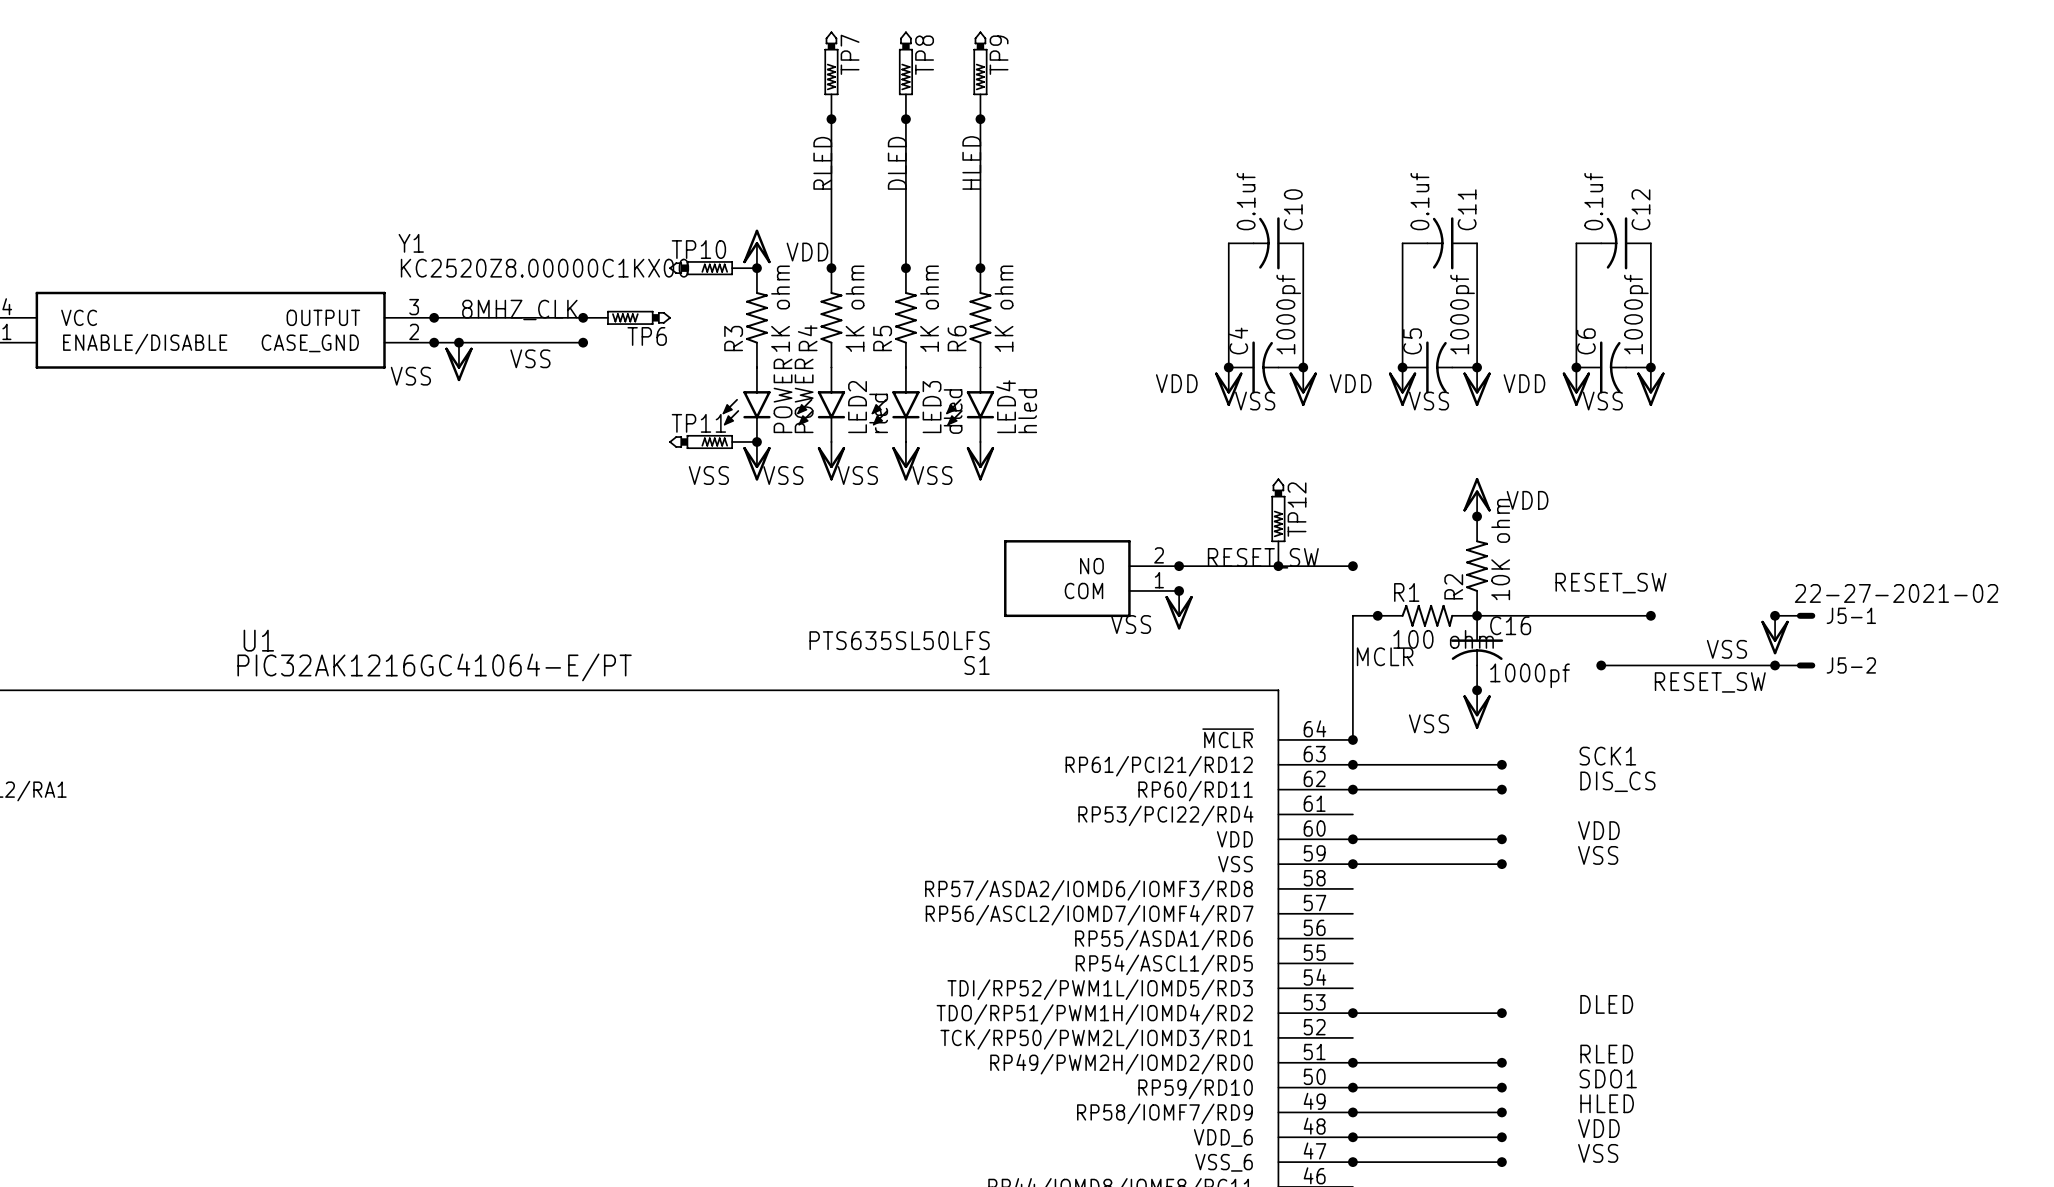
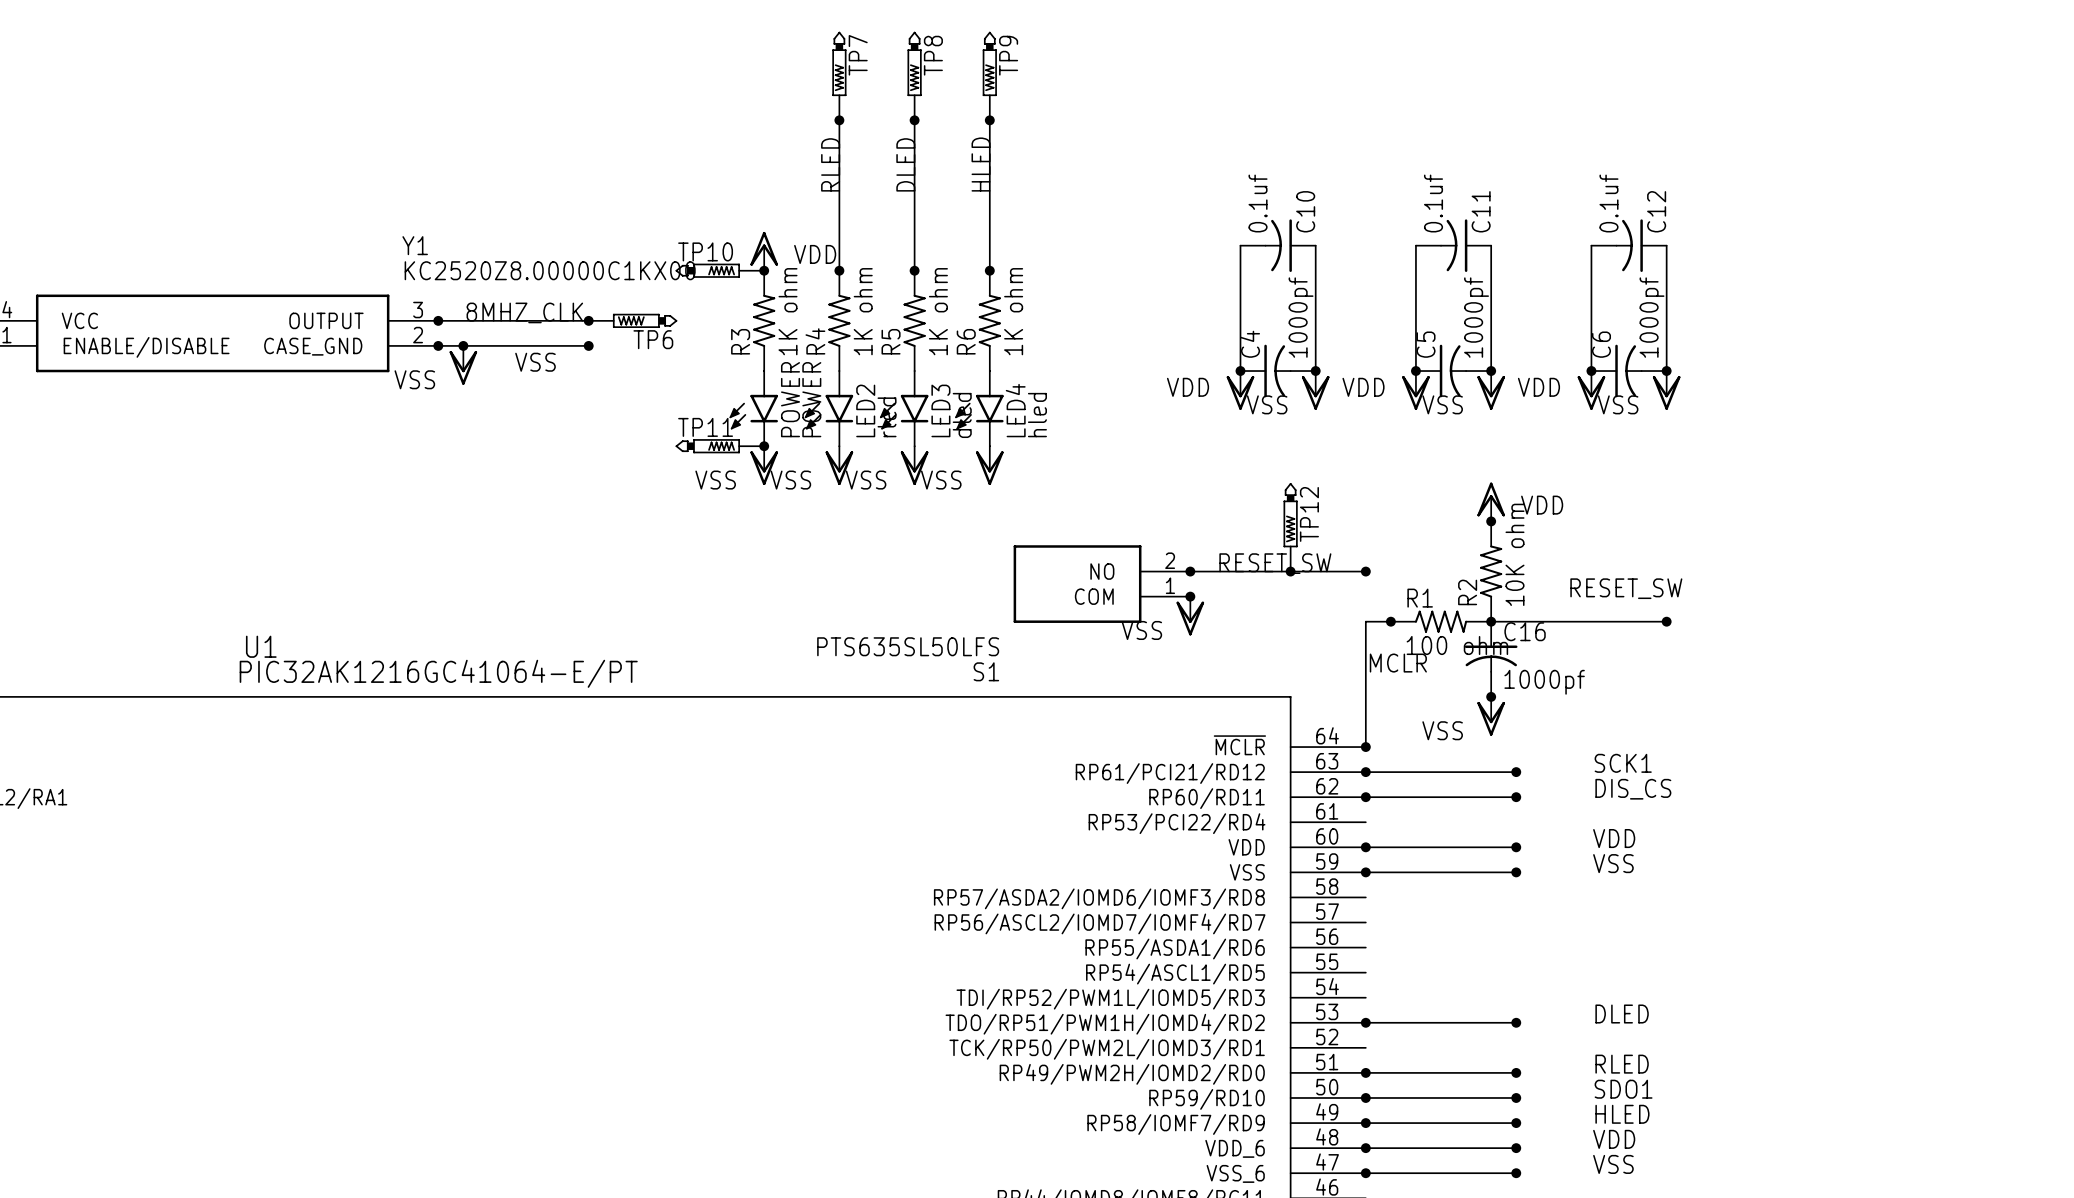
junction: (1775, 615) -> none
J5-1: 22-27-2021-02 (1795, 615) -> none
power symbol: VSS (1775, 635) -> none
wire: (1601, 665) (1775, 665) -> none
junction: (1601, 665) -> none
junction: (1775, 665) -> none
J5-2: (1795, 665) -> none
label: RESET_SW (1710, 682) -> none

